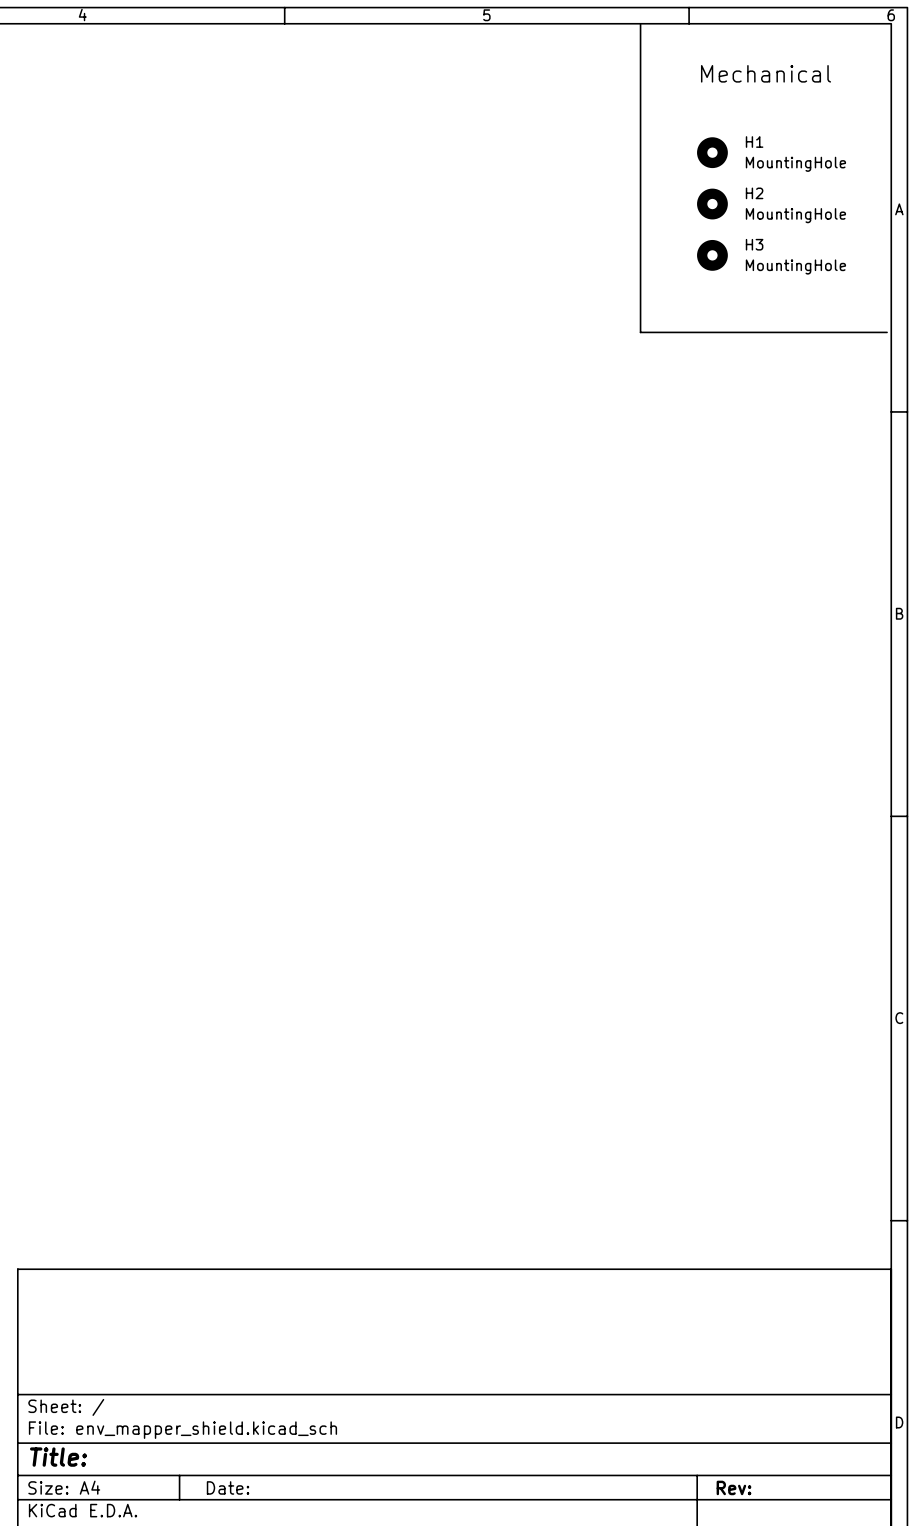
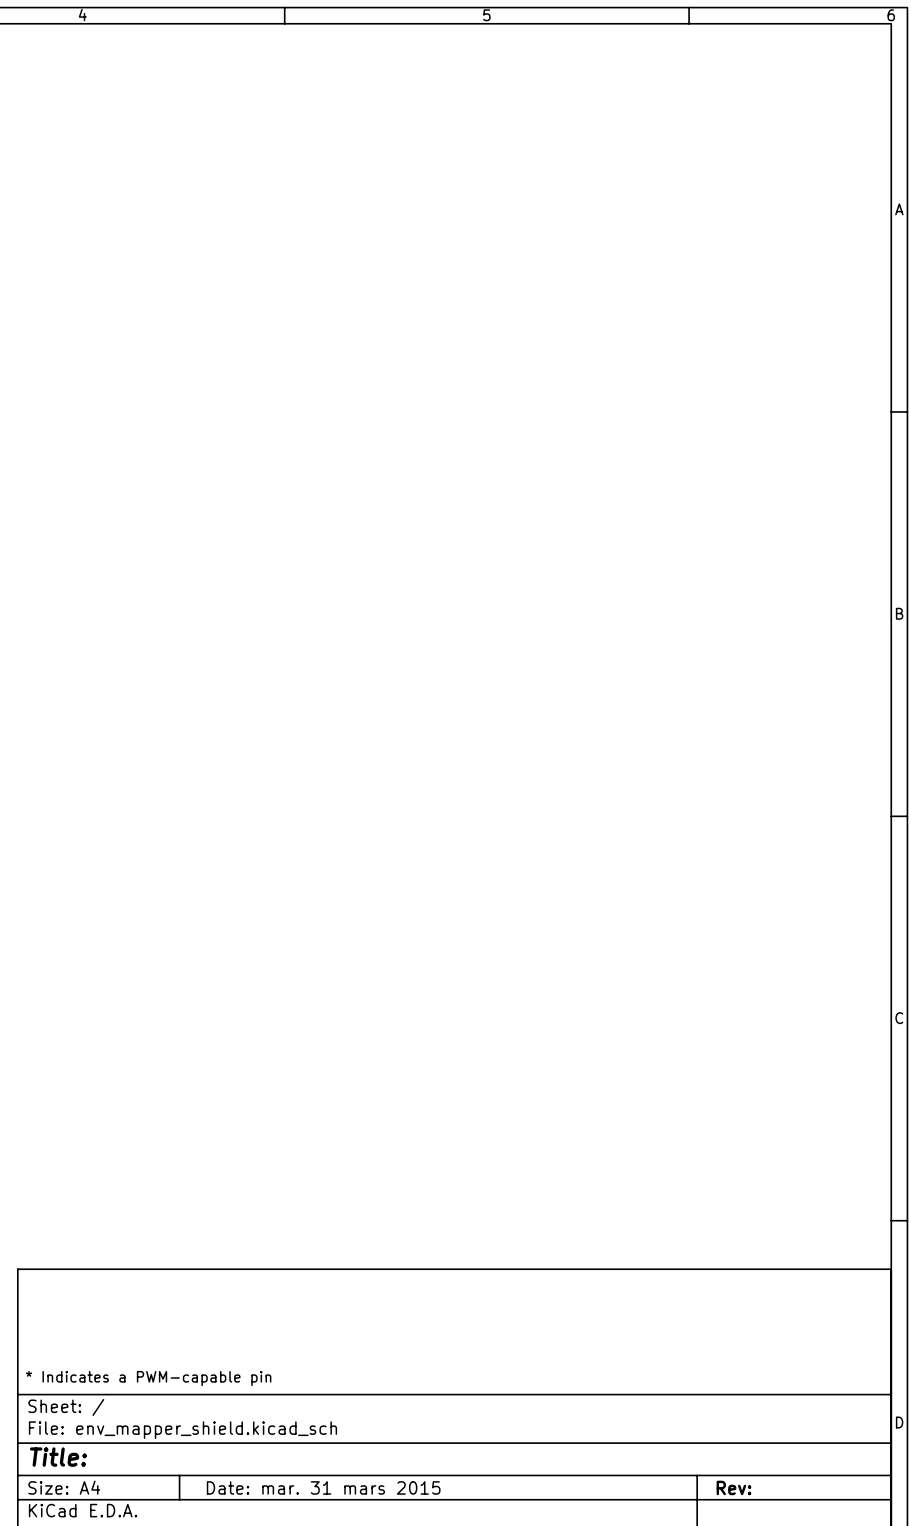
line: (640, 24) (640, 332) (887, 332) -> none
text: Mechanical (766, 73) -> none
H1: MountingHole (712, 152) -> none
H2: MountingHole (712, 204) -> none
H3: MountingHole (712, 255) -> none
text: none -> * Indicates a PWM-capable pin (148, 1378)
title block: Date: (228, 1487) -> Date: mar. 31 mars 2015 (323, 1487)

